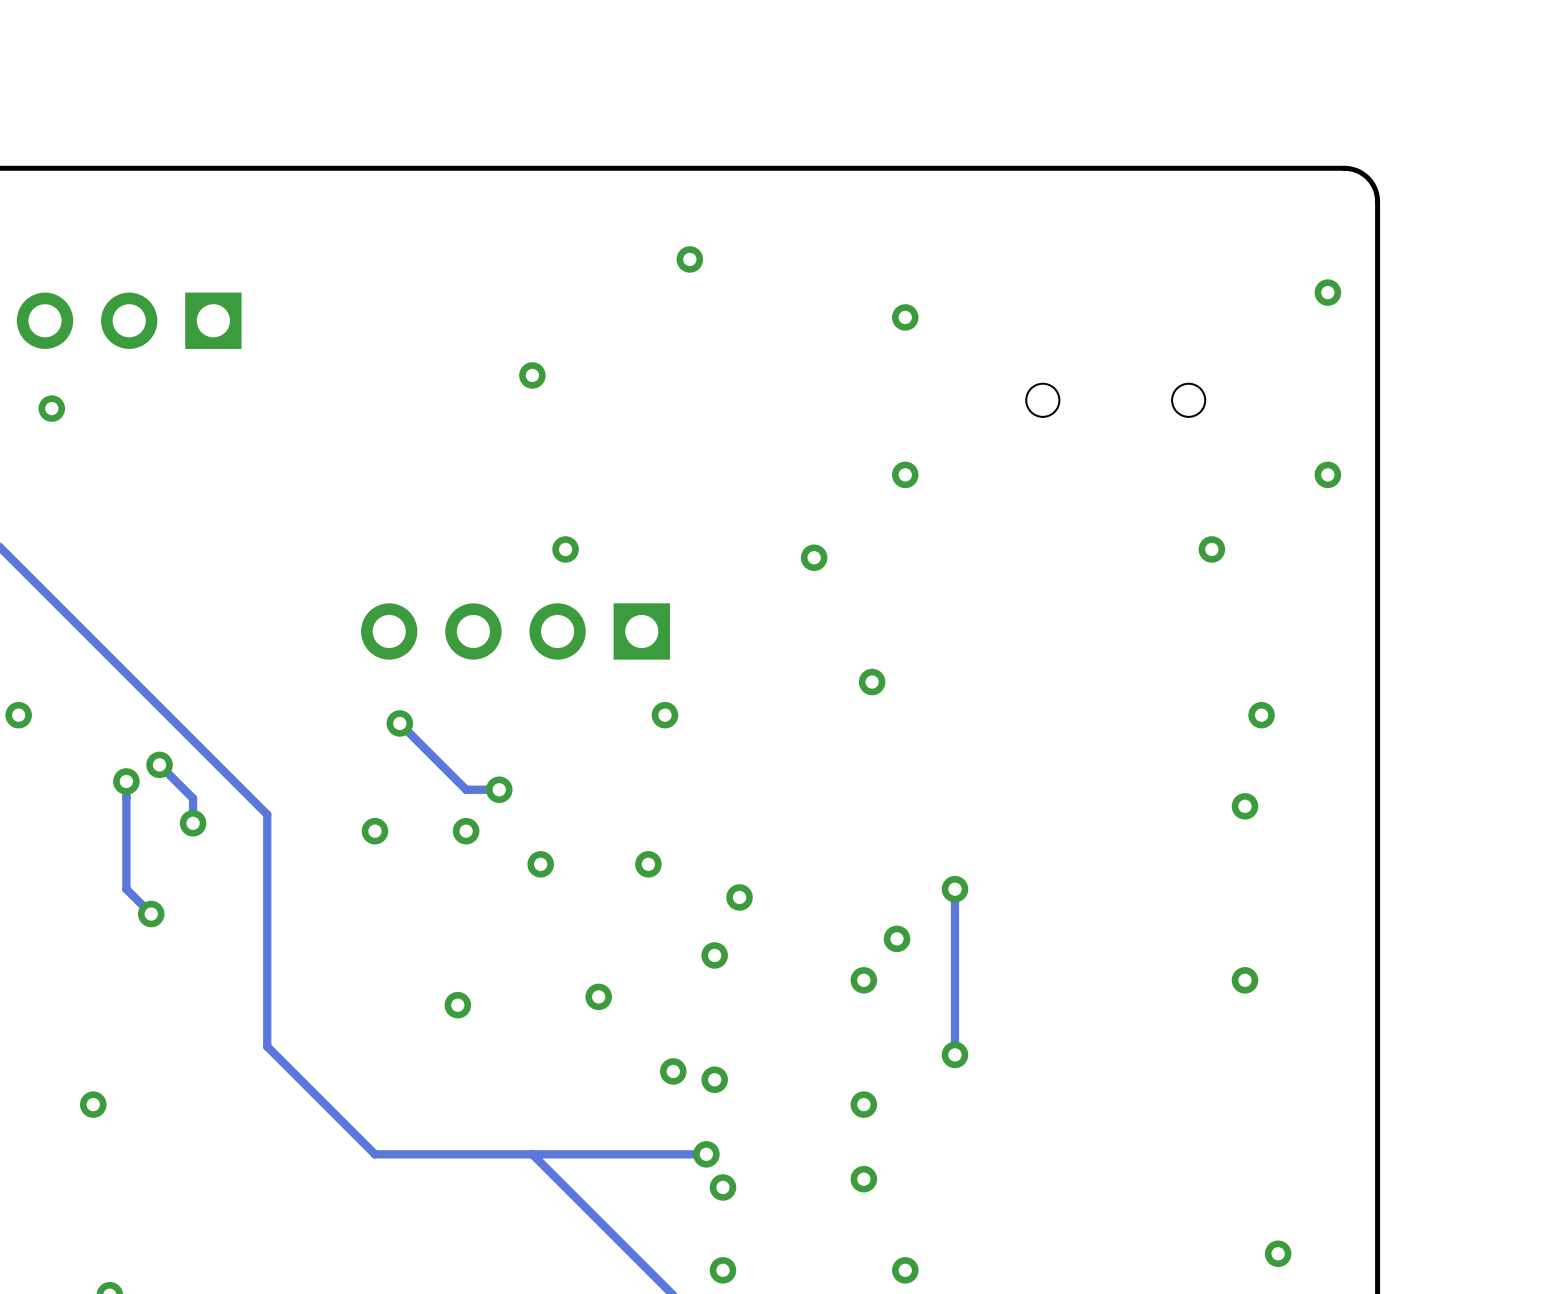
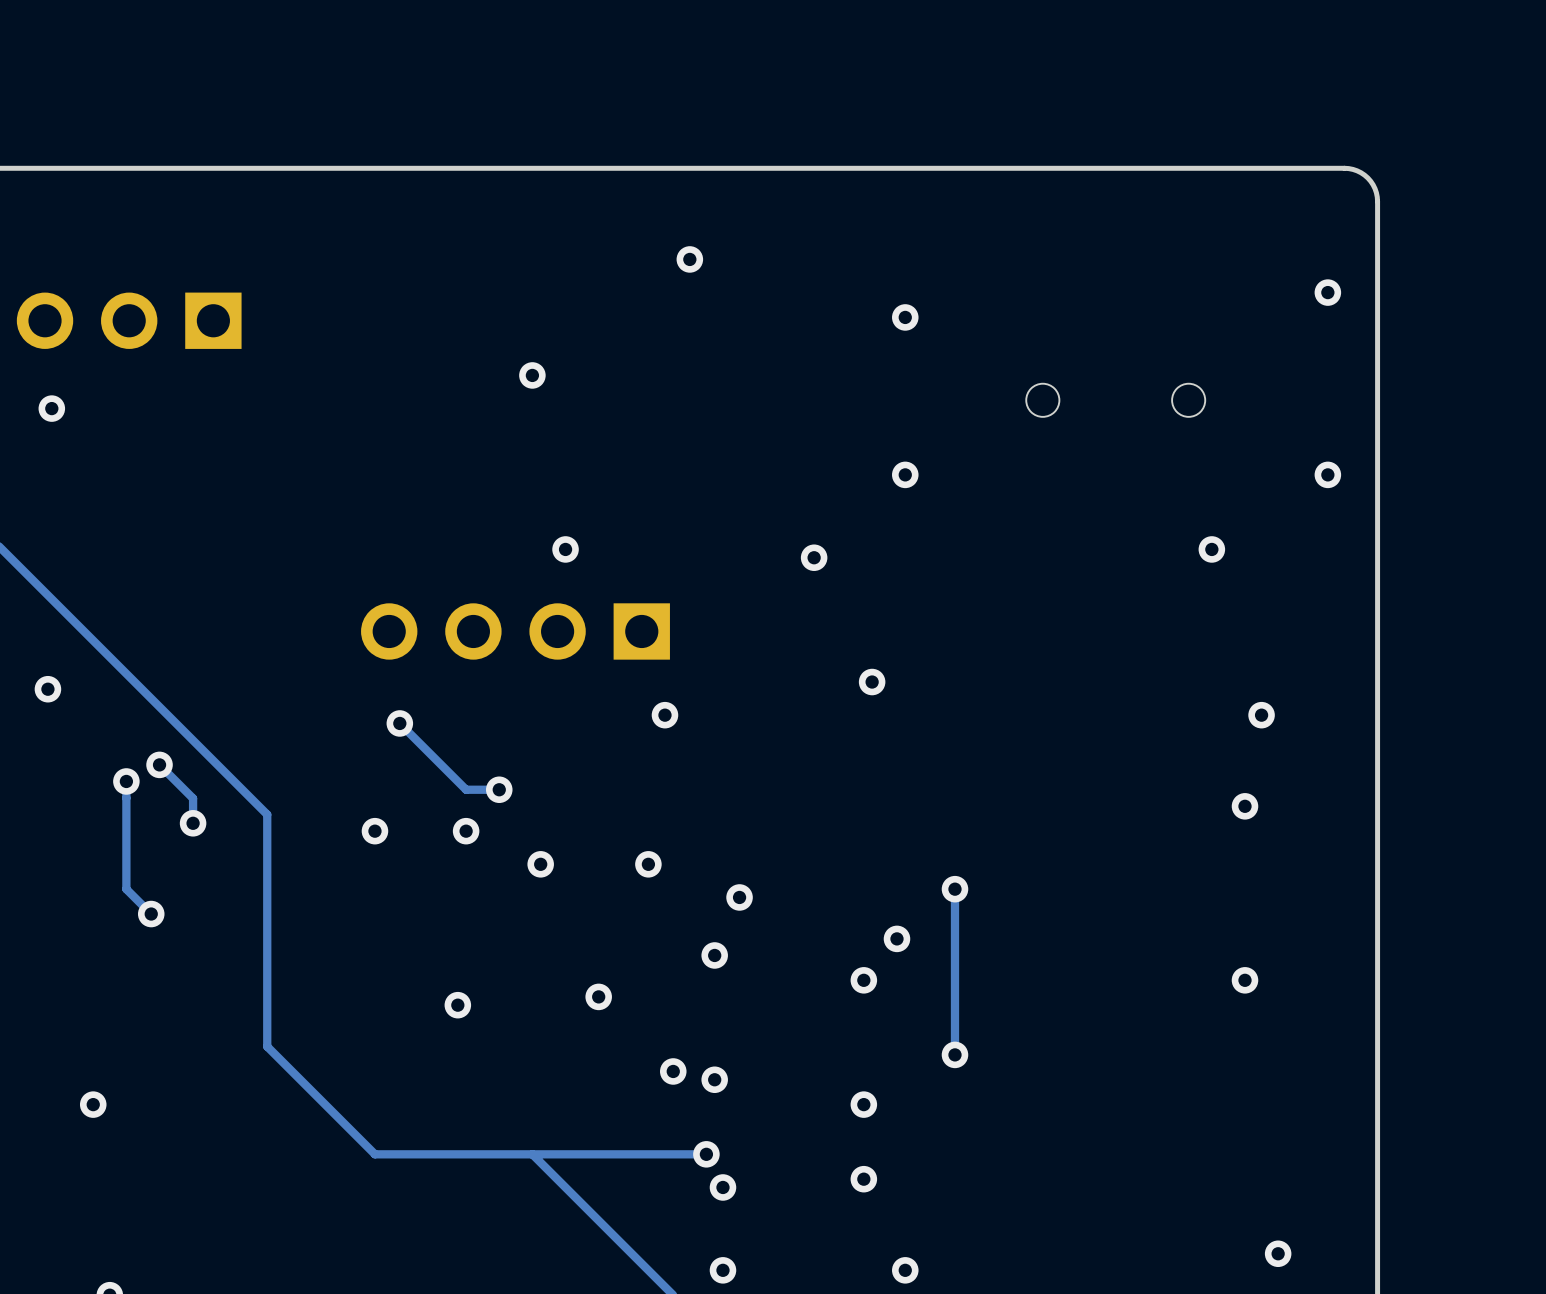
via position: (18, 715) -> (47, 689)

